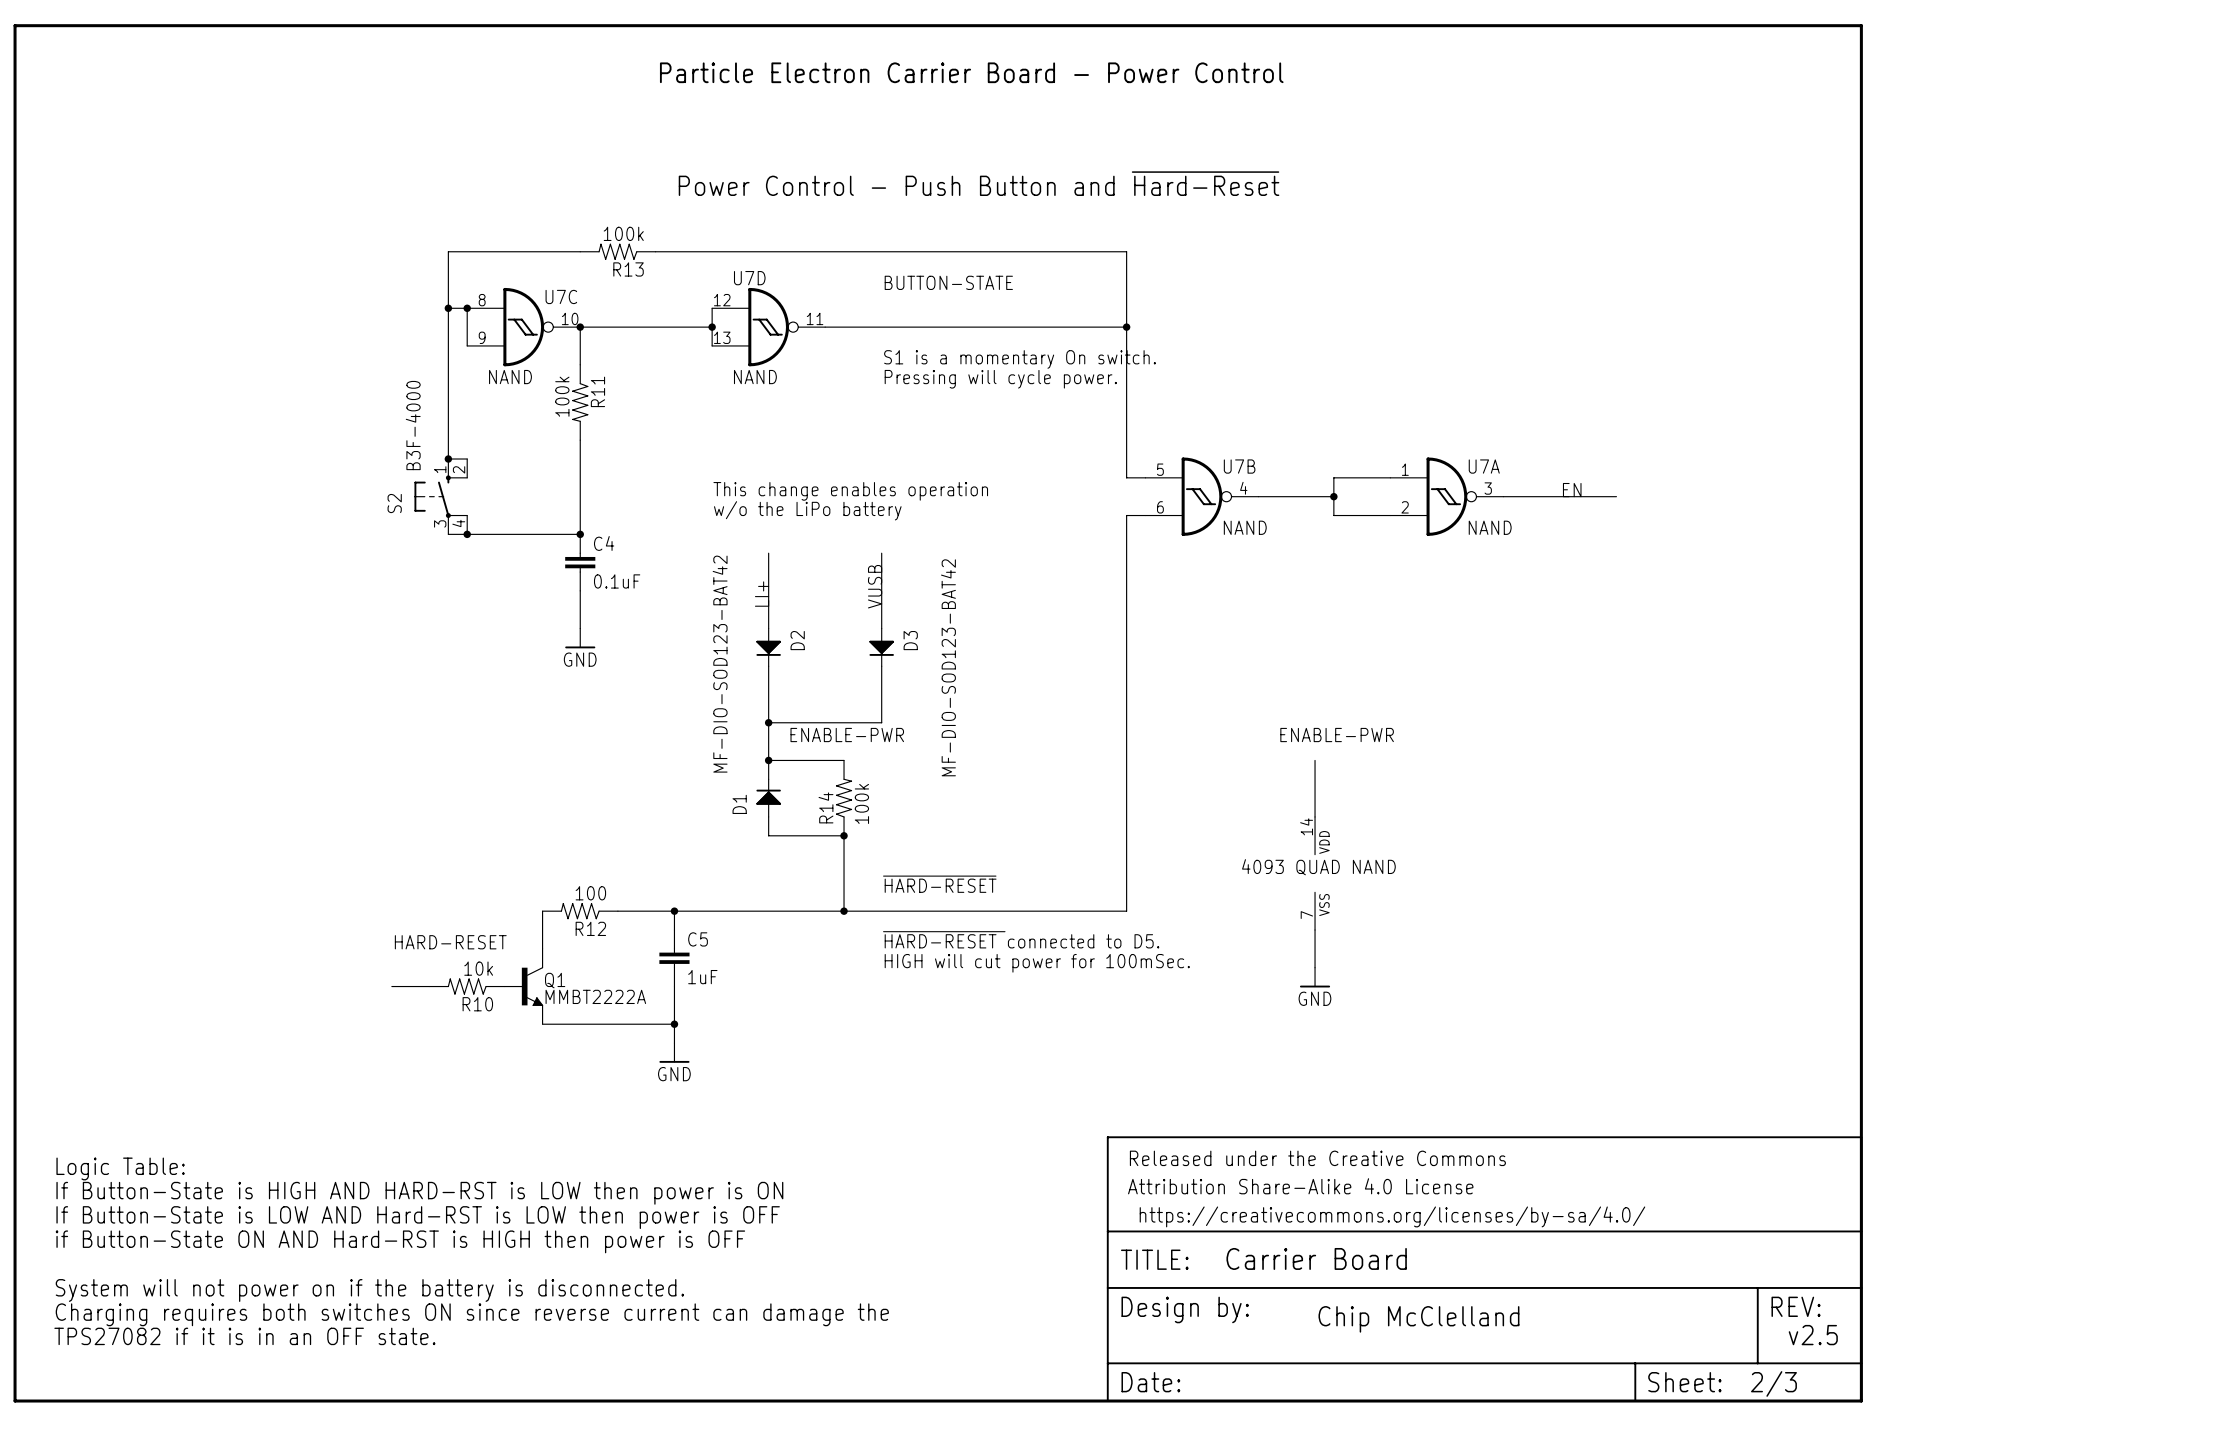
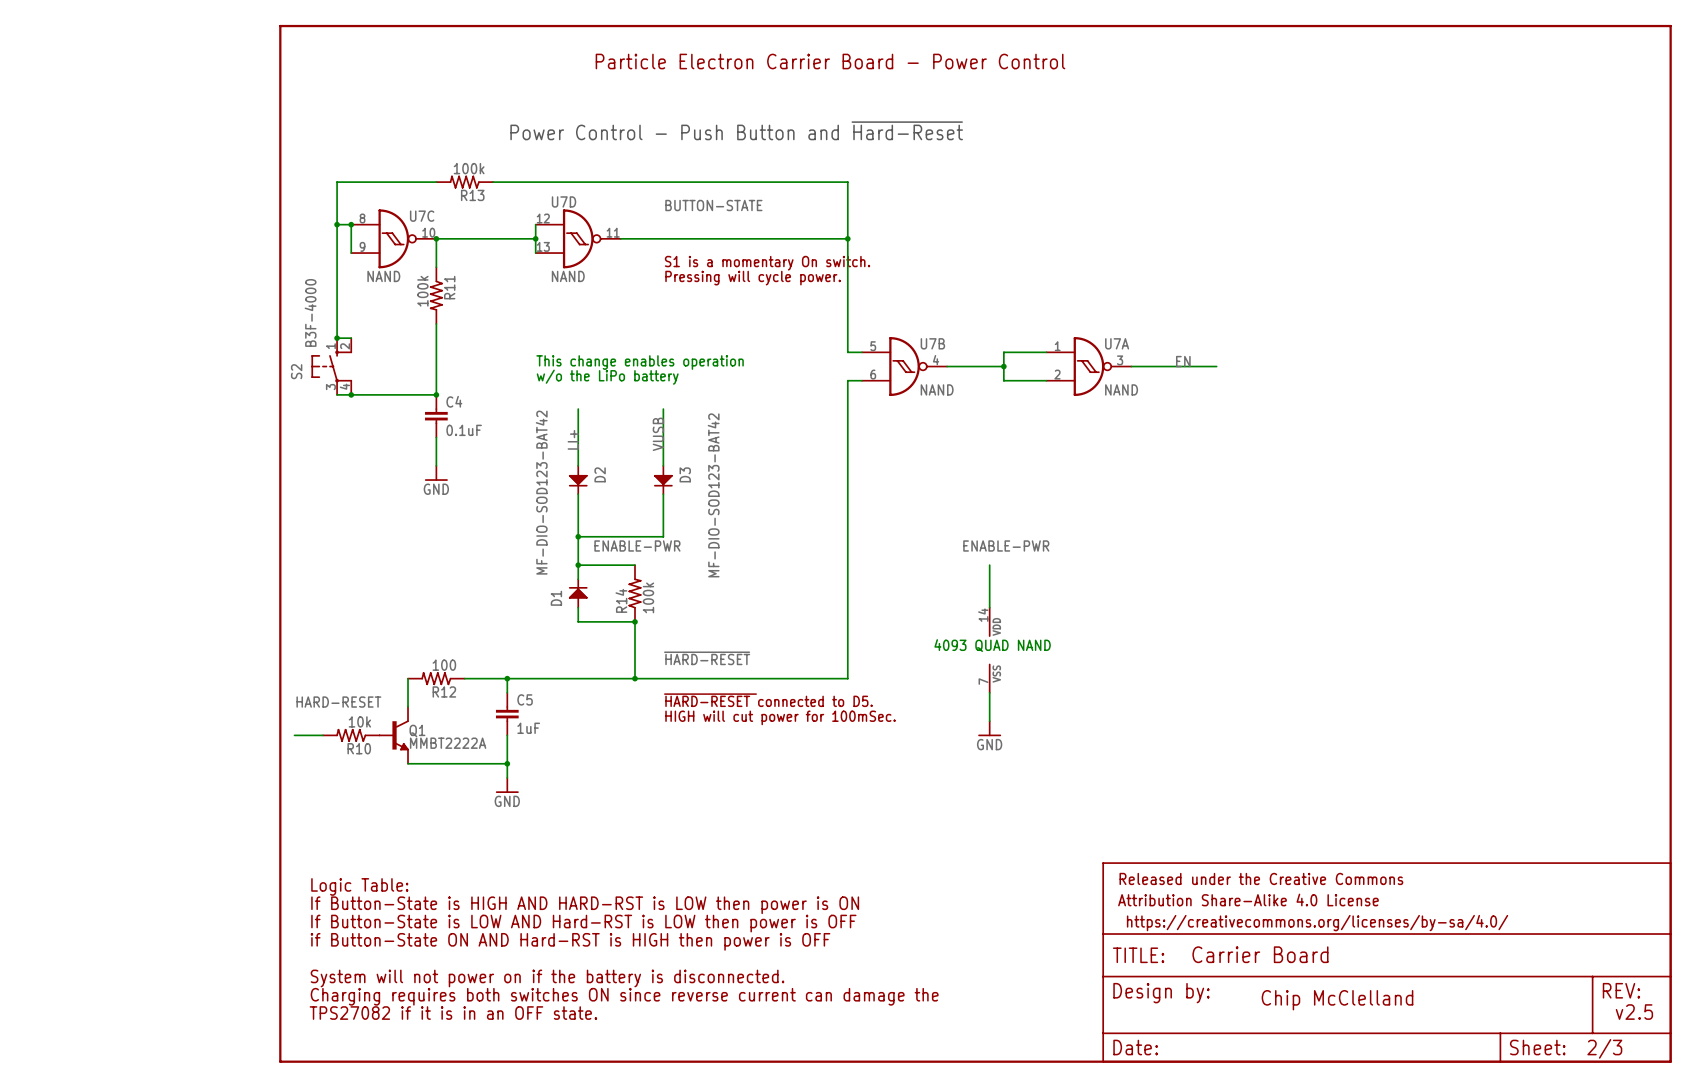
text position: Particle Electron Carrier Board - Power Control (971, 72) -> Particle Electron Carrier Board - Power Control (830, 61)
part: (938, 713) -> none
part: none -> (975, 543)
text: Logic Table: (120, 1168) -> none
text: none -> Logic Table: (359, 886)
text: If Button-State is HIGH AND HARD-RST is LOW then power is ON (419, 1193) -> none
text: none -> If Button-State is HIGH AND HARD-RST is LOW then power is ON (585, 905)
text: If Button-State is LOW AND Hard-RST is LOW then power is OFF (418, 1217) -> none
text: none -> If Button-State is LOW AND Hard-RST is LOW then power is OFF (583, 923)
text: if Button-State ON AND Hard-RST is HIGH then power is OFF (400, 1241) -> none
text: none -> if Button-State ON AND Hard-RST is HIGH then power is OFF (570, 941)
part: (1484, 1269) -> none
part: none -> (1386, 962)
text: System will not power on if the battery is disconnected. (369, 1290) -> none
text: none -> System will not power on if the battery is disconnected. (547, 978)
text: Charging requires both switches ON since reverse current can damage the (472, 1314) -> none
text: Chip McClelland (1418, 1319) -> none
text: none -> Charging requires both switches ON since reverse current can damage the (624, 996)
text: v2.5 (1813, 1335) -> none
text: TPS27082 if it is in an OFF state. (244, 1336) -> none
text: none -> Chip McClelland (1337, 1000)
text: none -> v2.5 (1634, 1012)
text: none -> TPS27082 if it is in an OFF state. (453, 1013)

